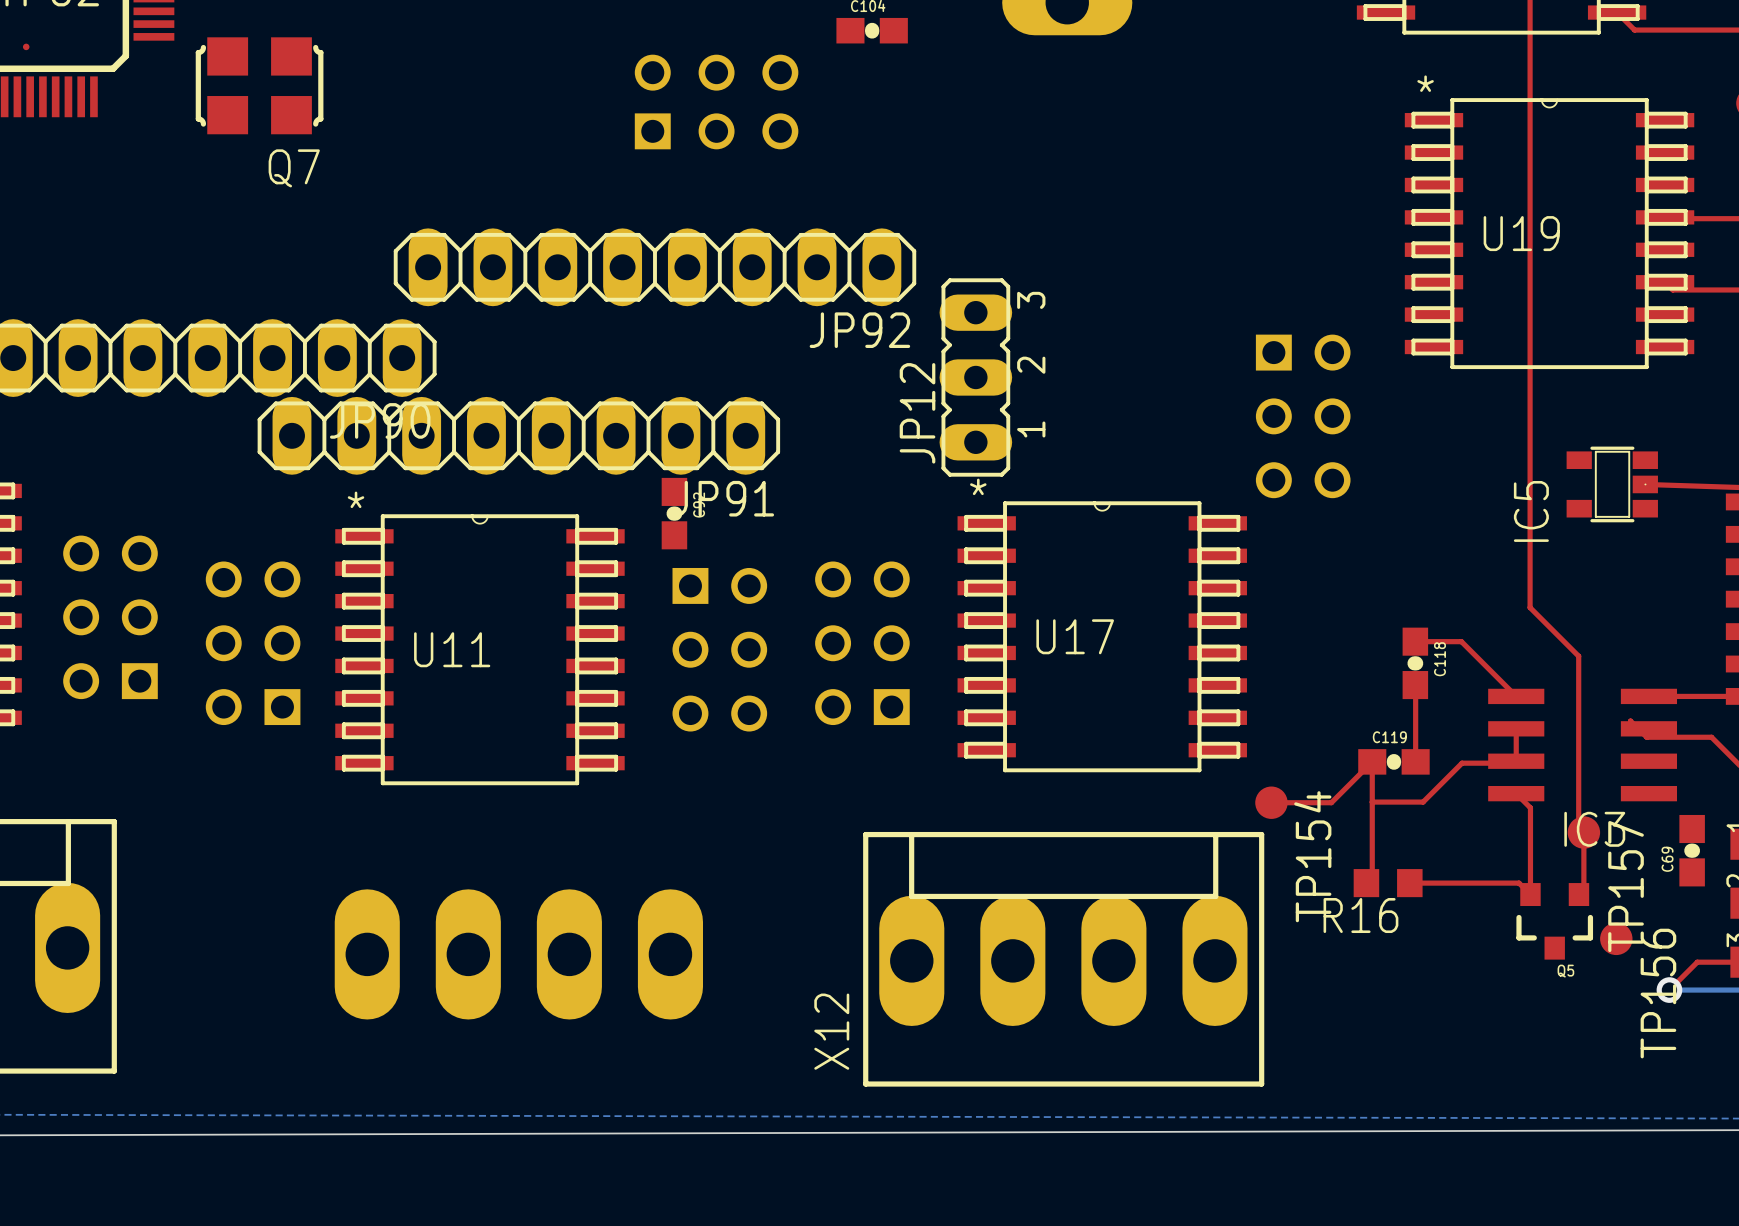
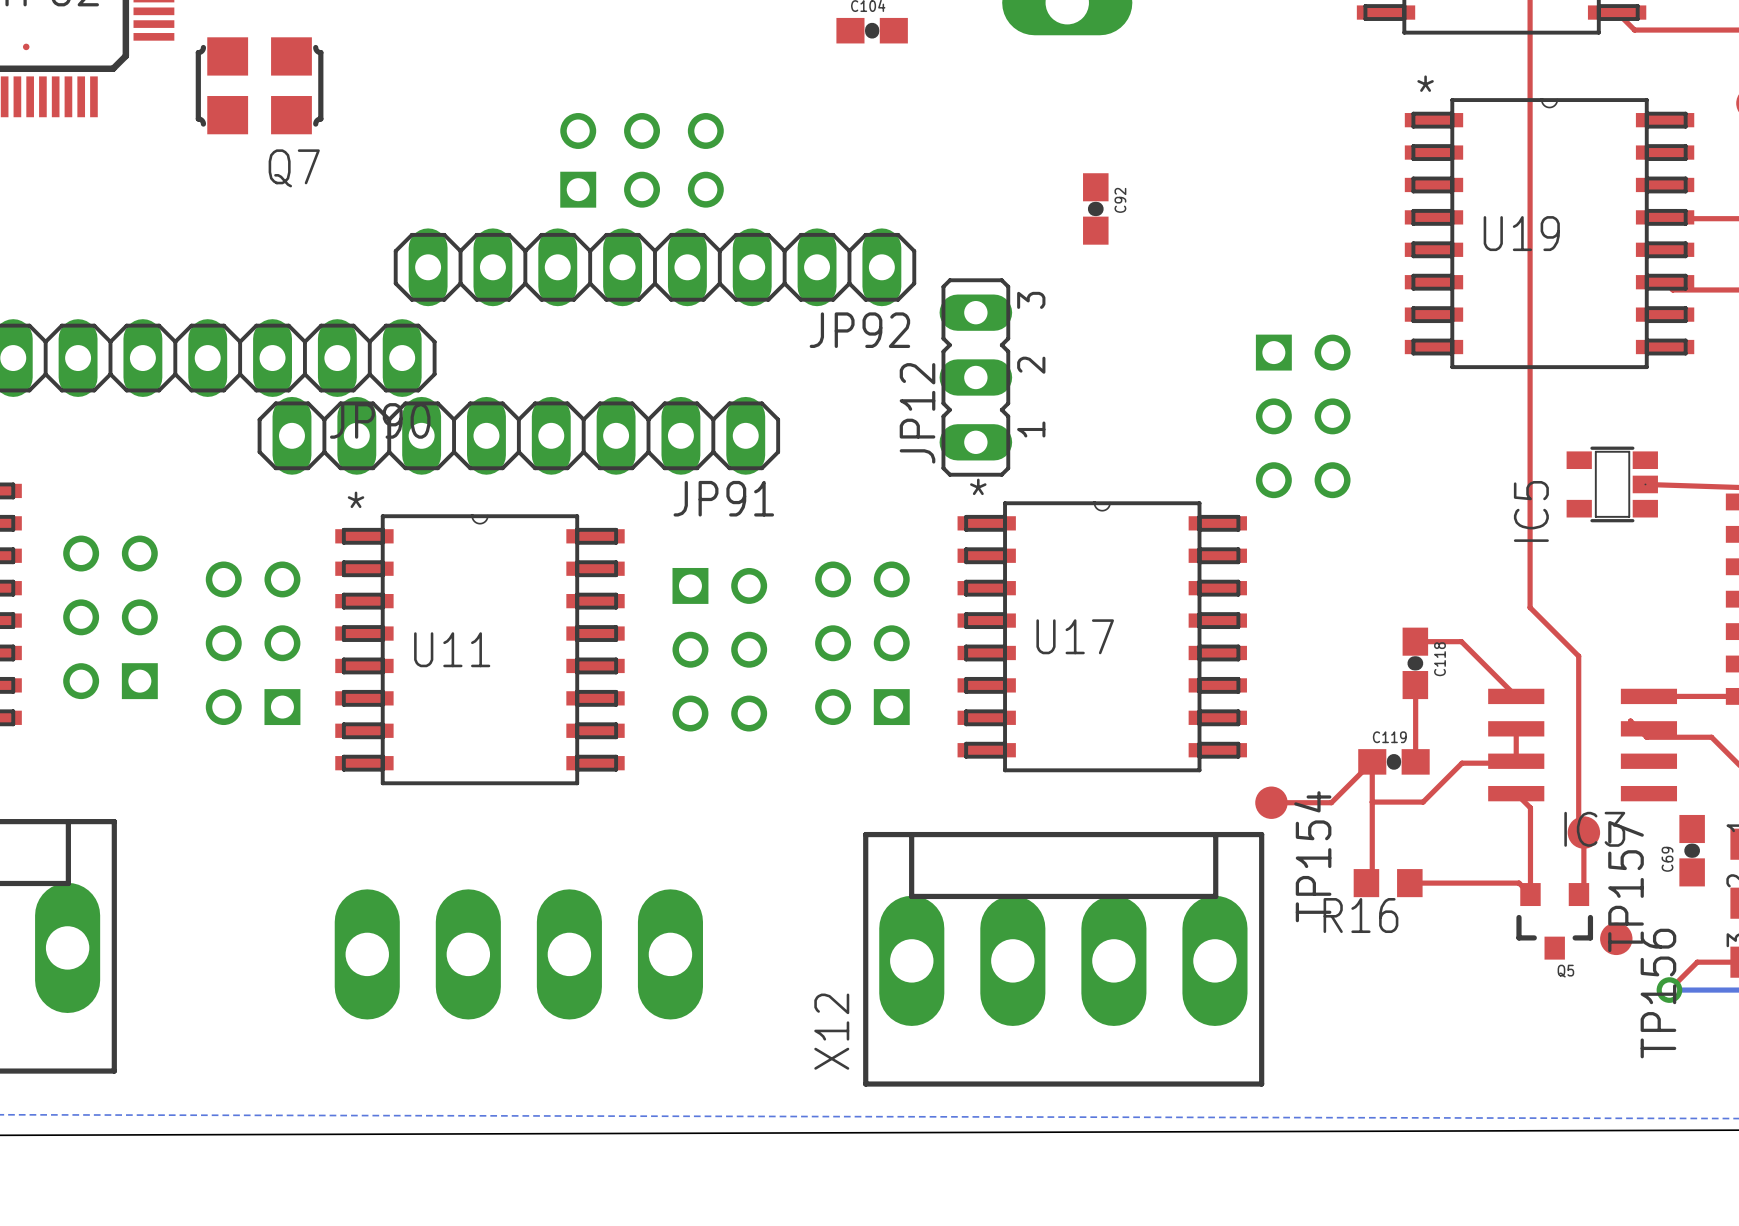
part position: (716, 102) -> (642, 160)
C92 position: (674, 513) -> (1095, 208)

